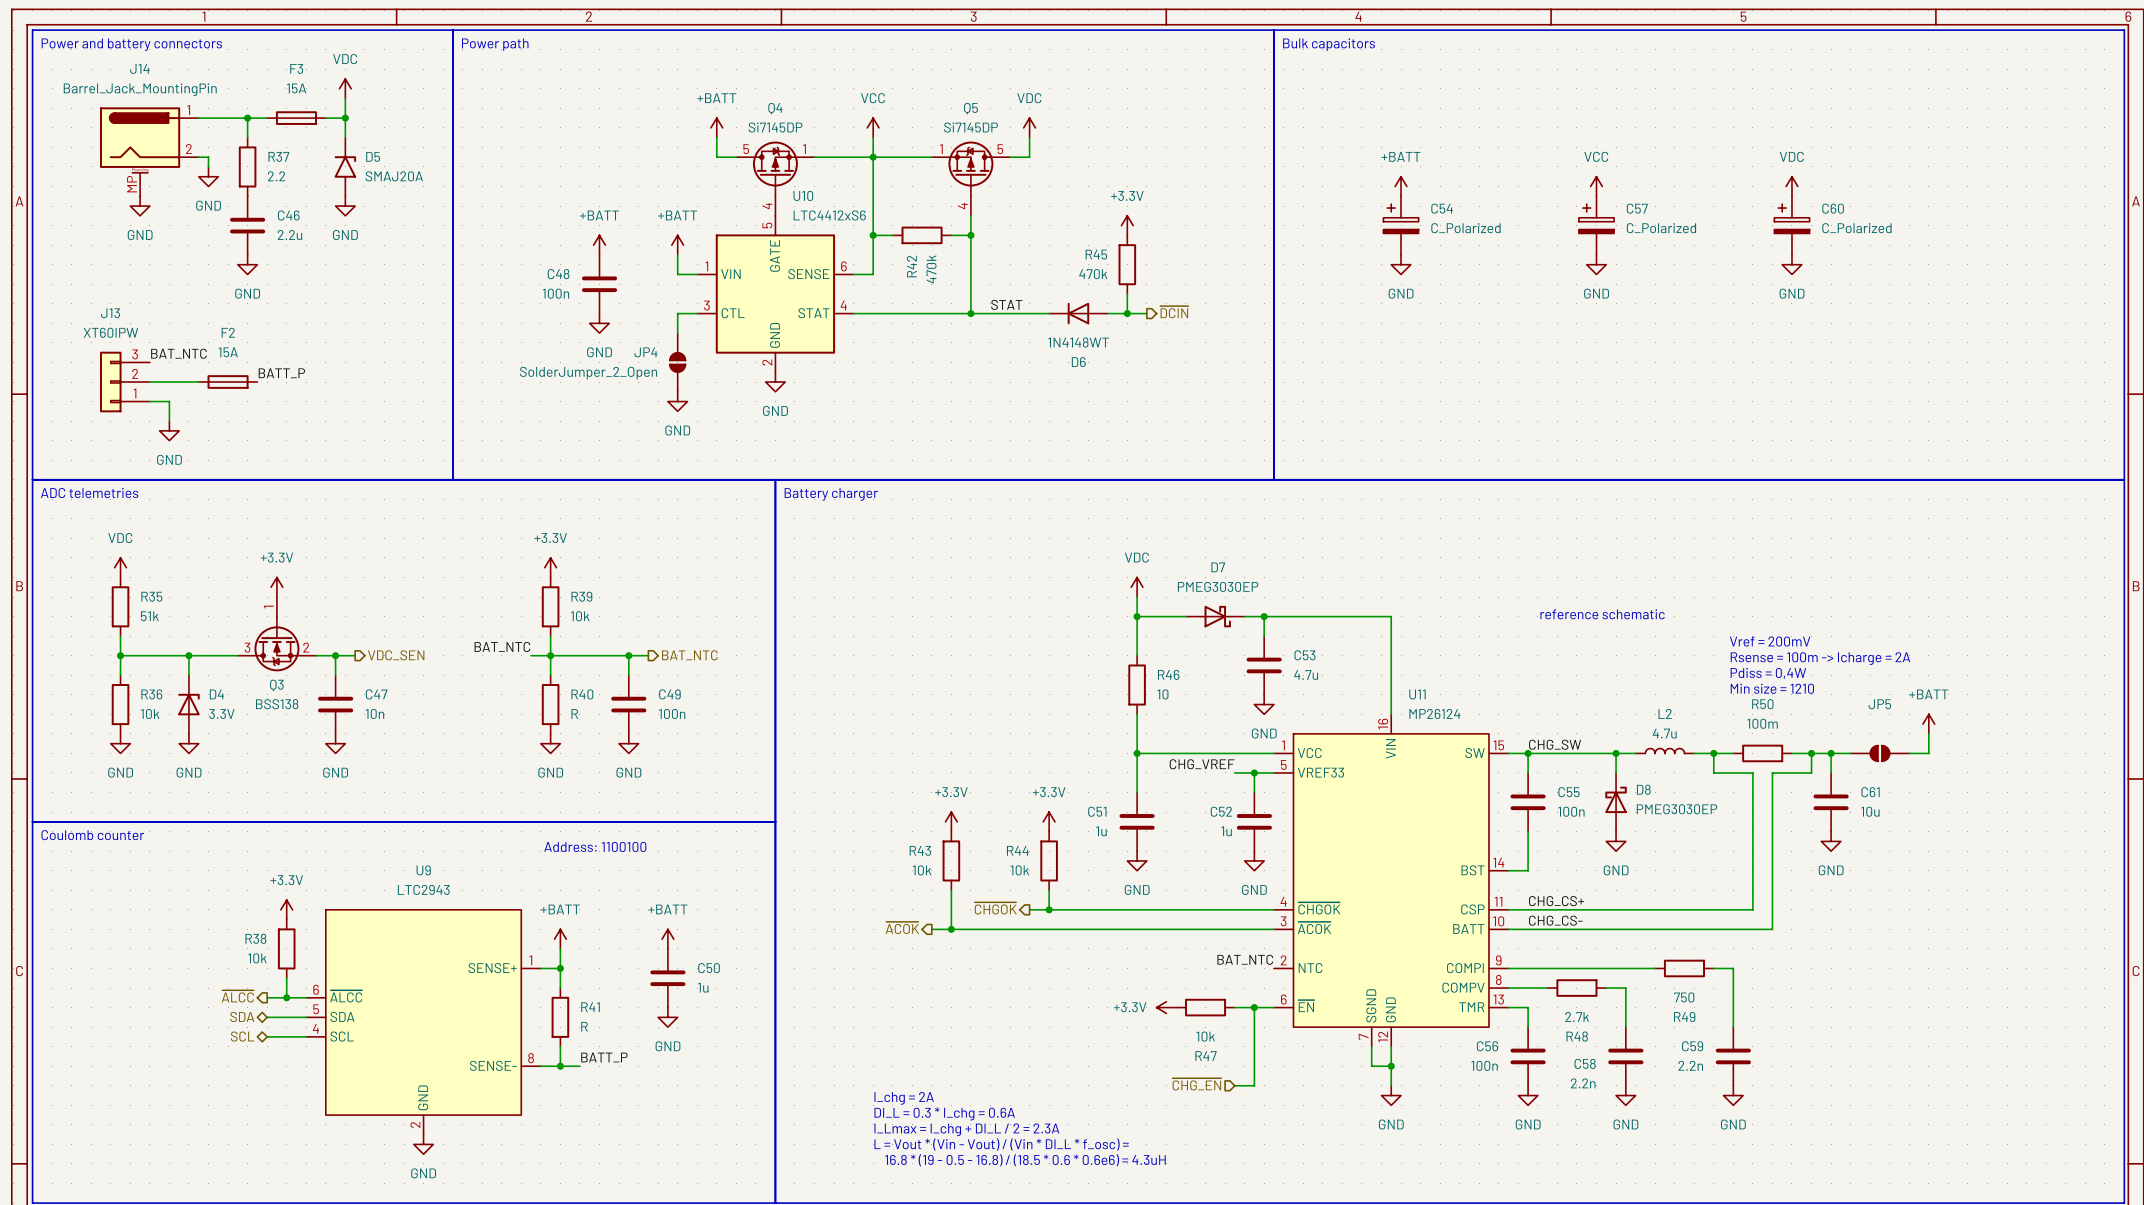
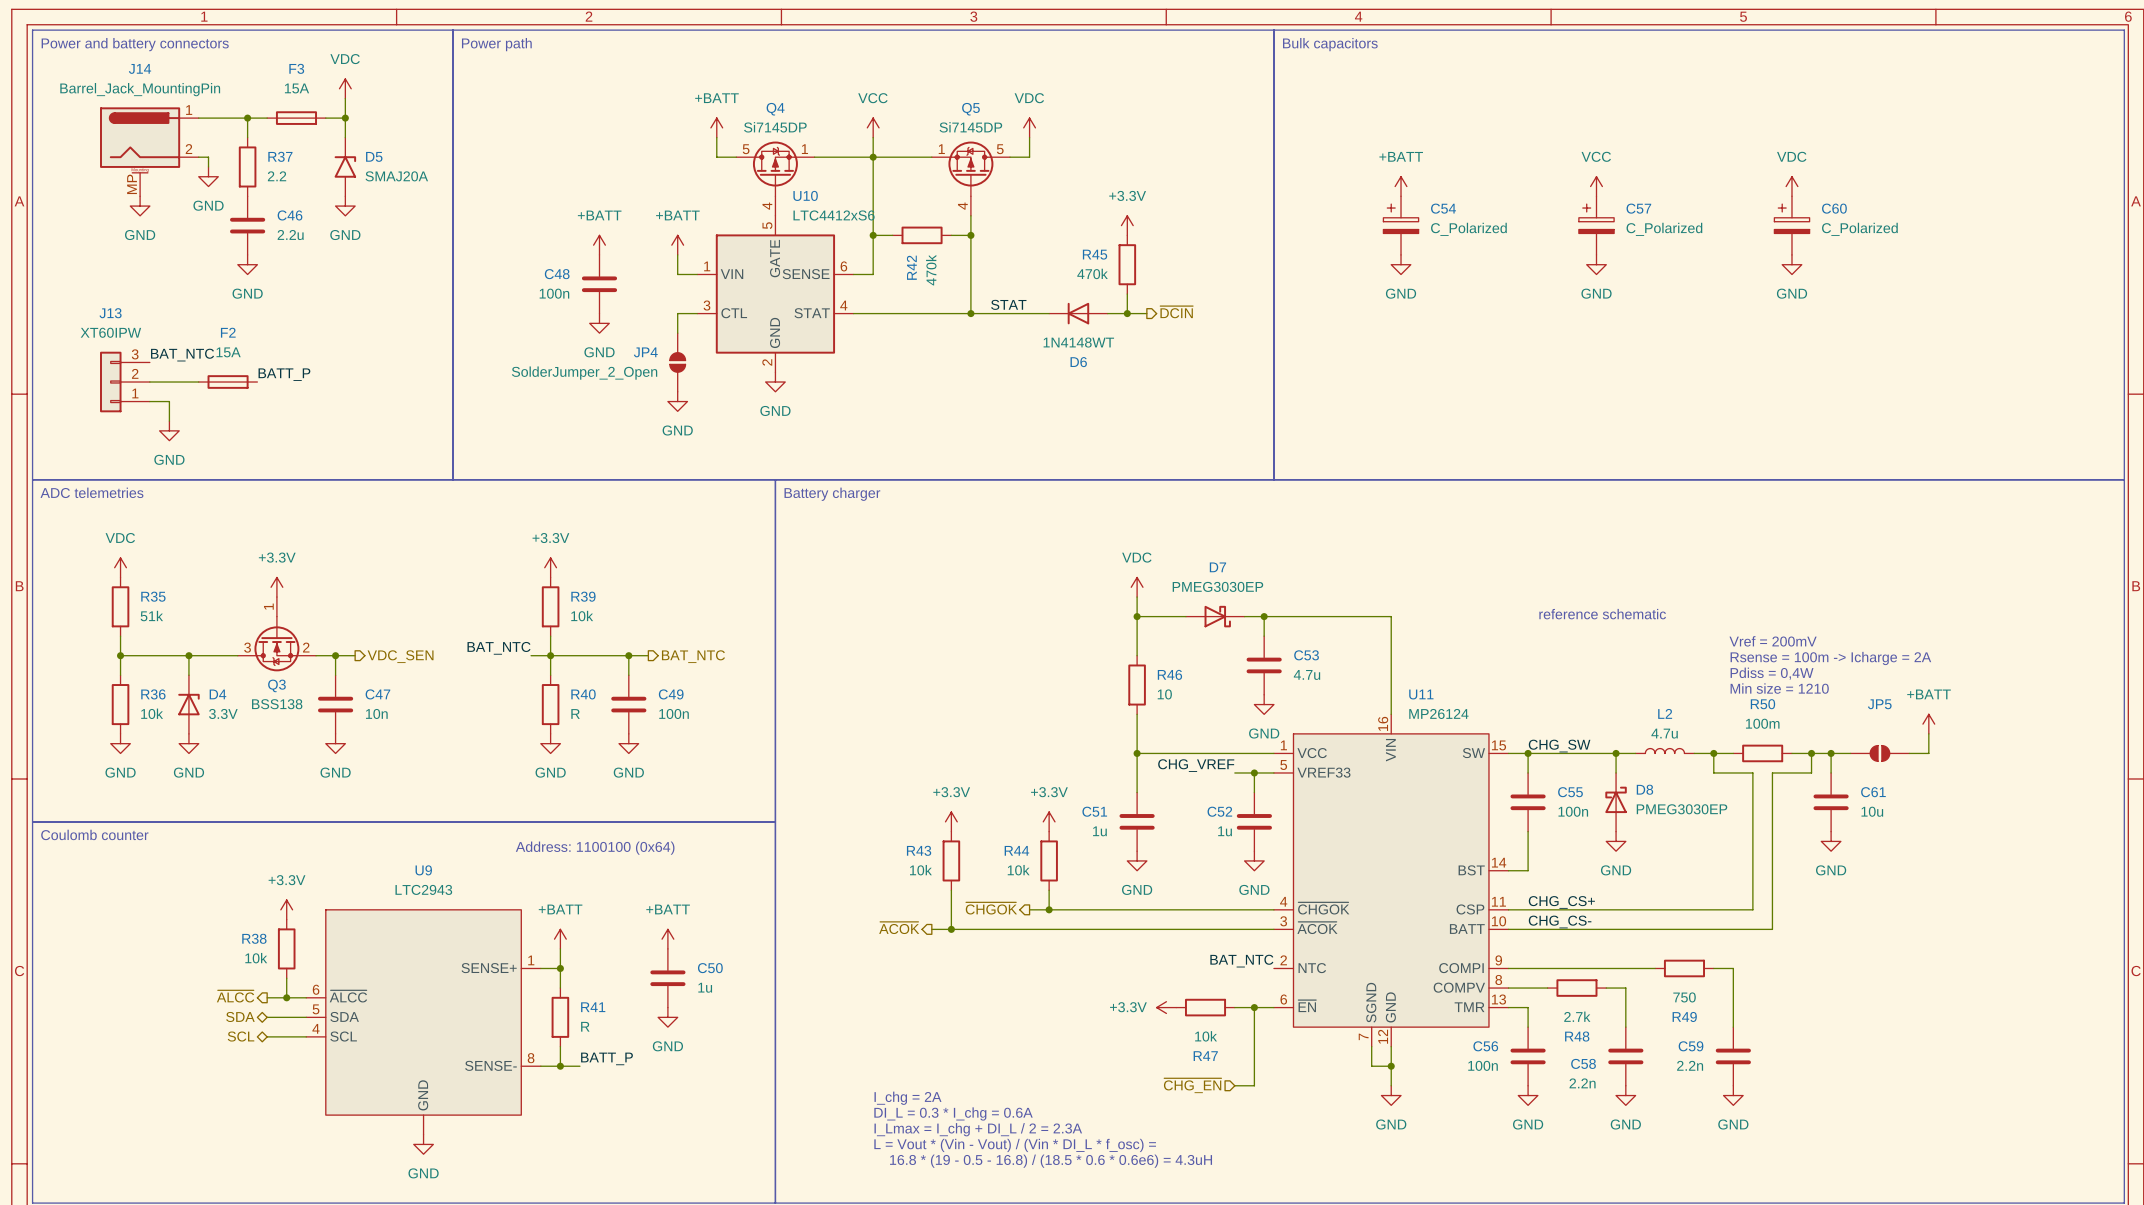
text: Address: 1100100 (595, 846) -> Address: 1100100 (0x64) (595, 848)
U9 pin number: 2 (415, 1124) -> none

